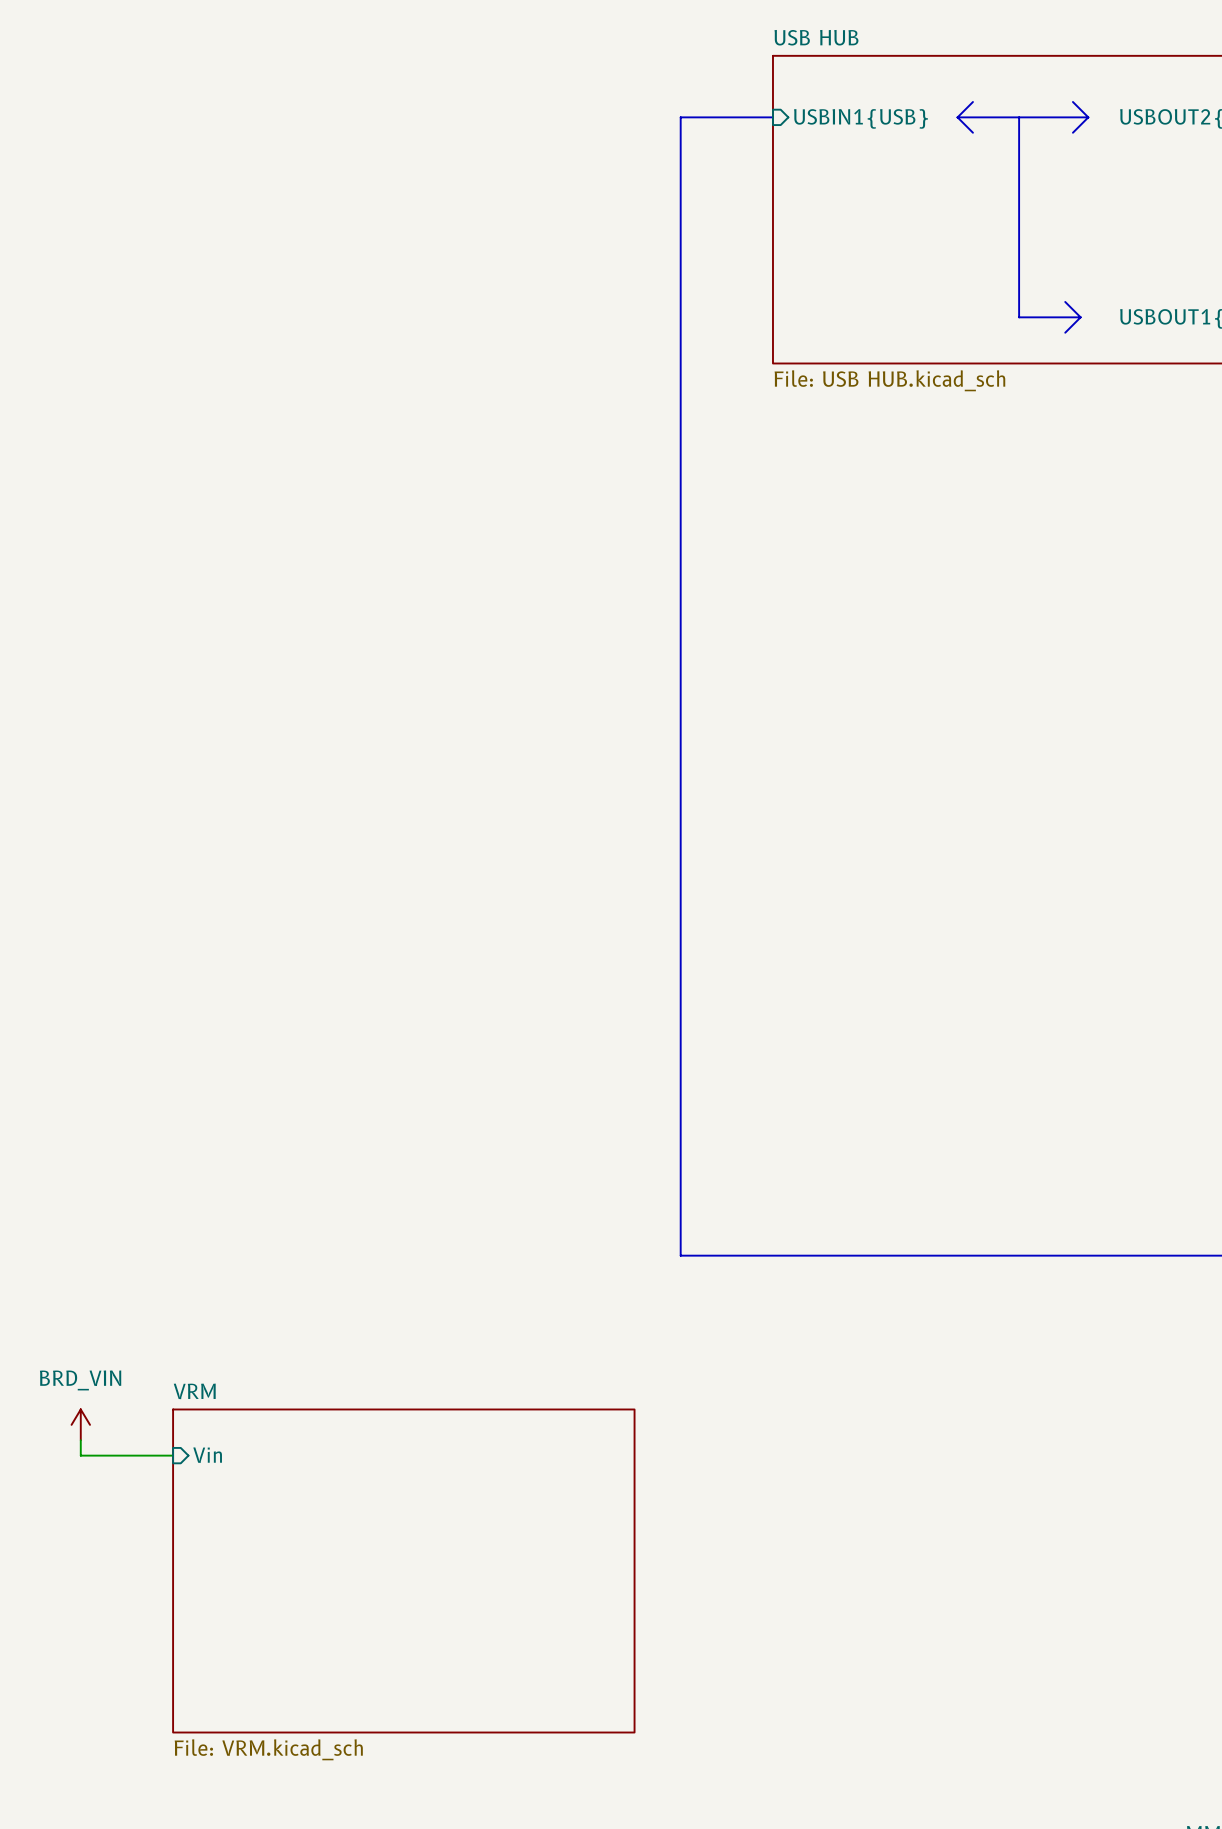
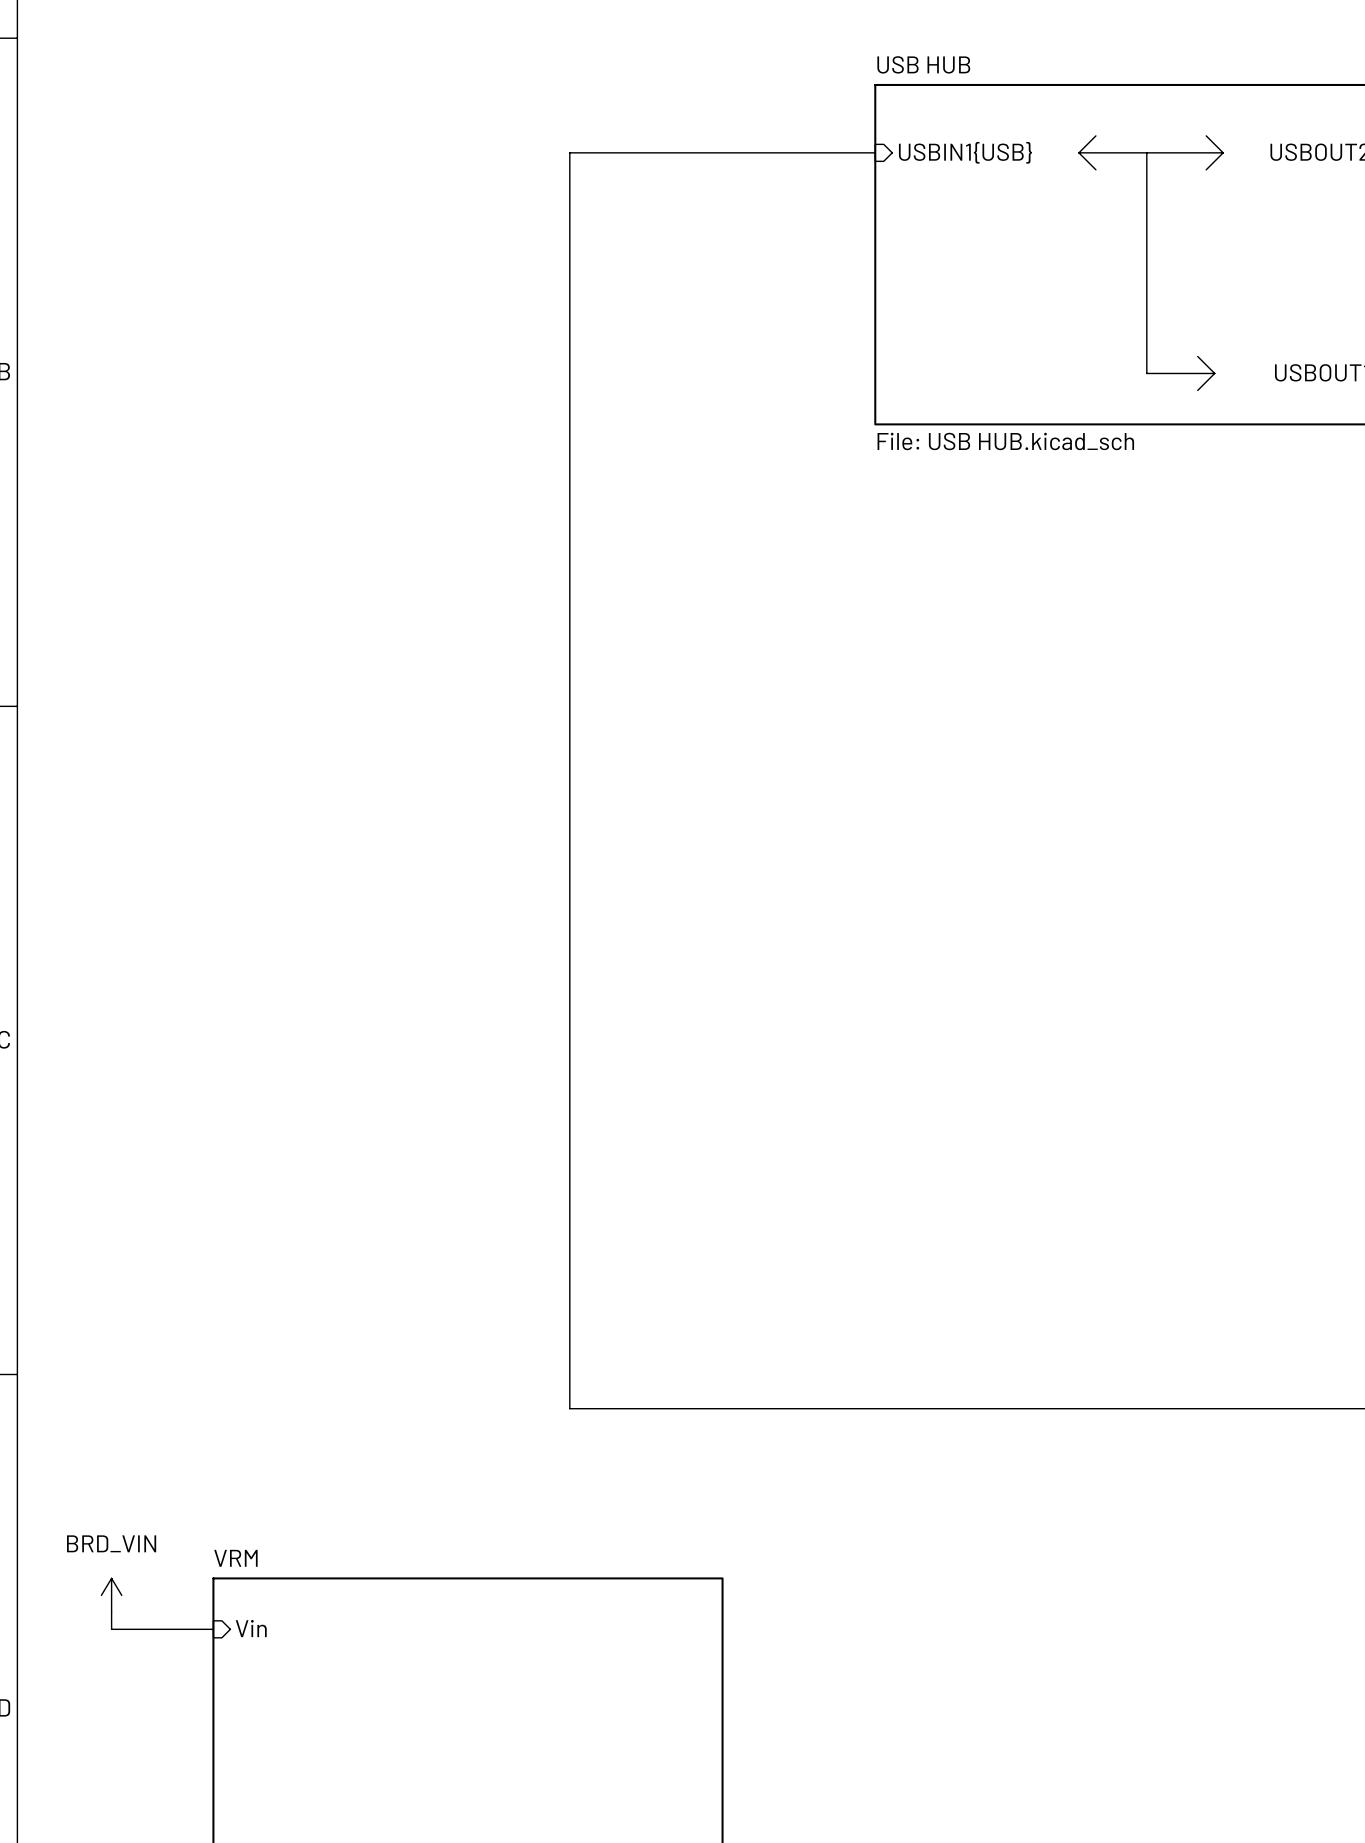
bus: (680, 117) (680, 1255) -> (773, 152) (569, 152) (569, 1408) (773, 1408)

